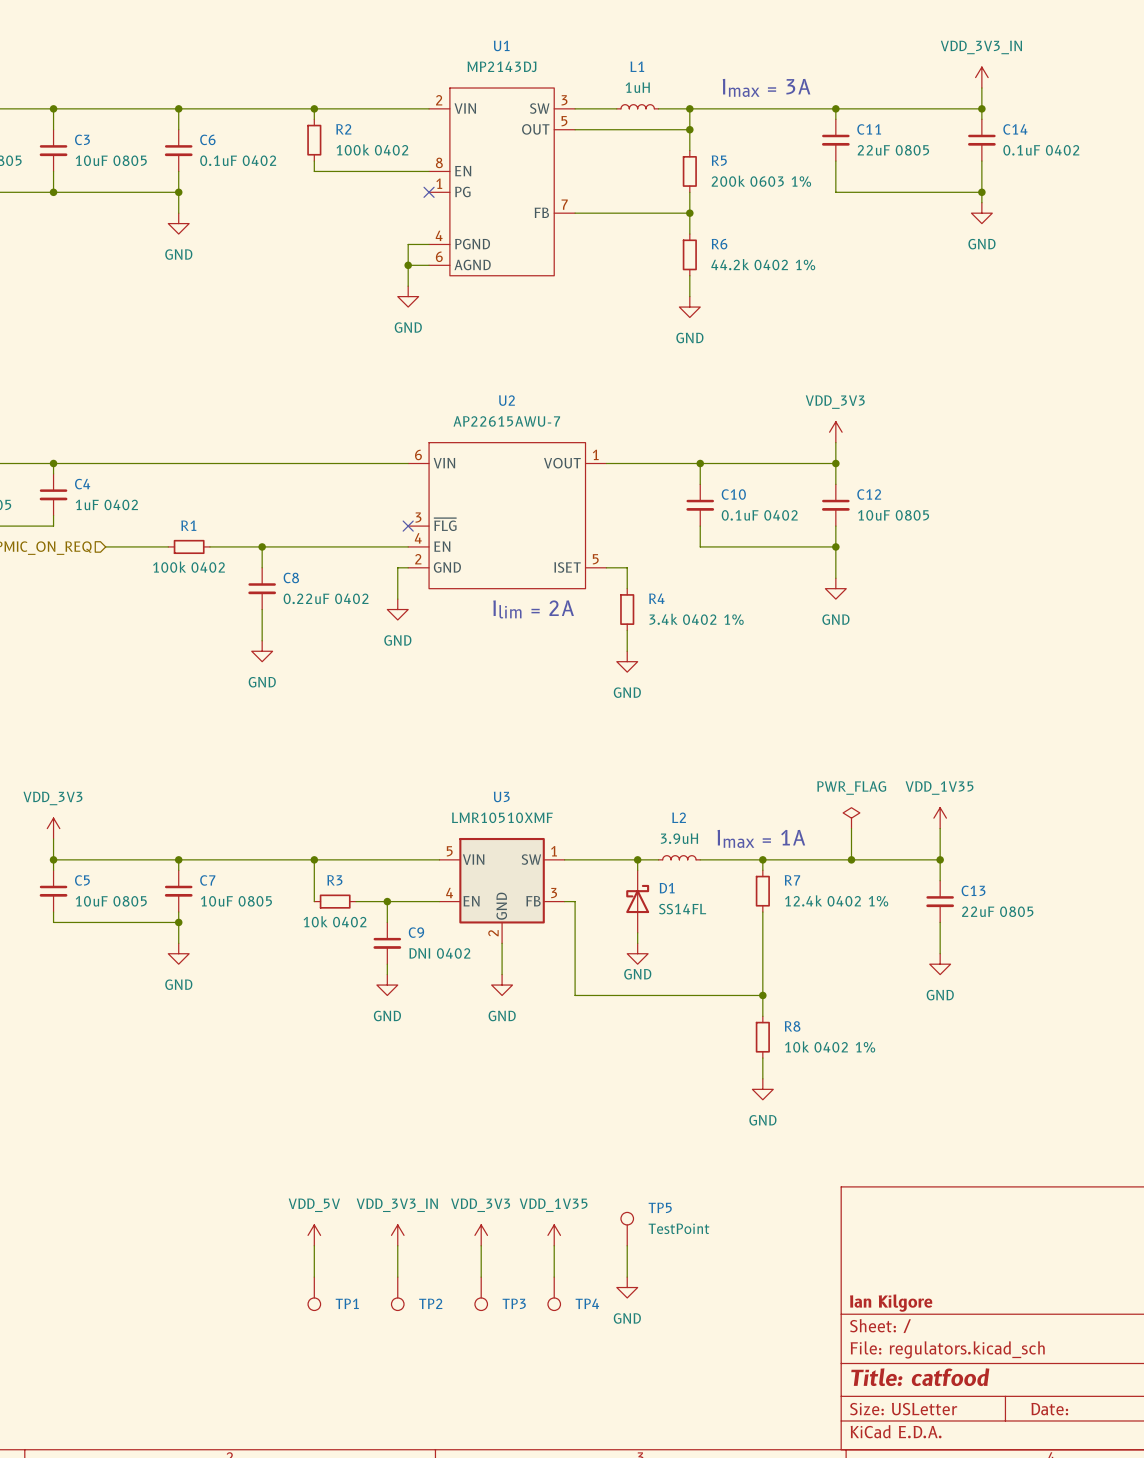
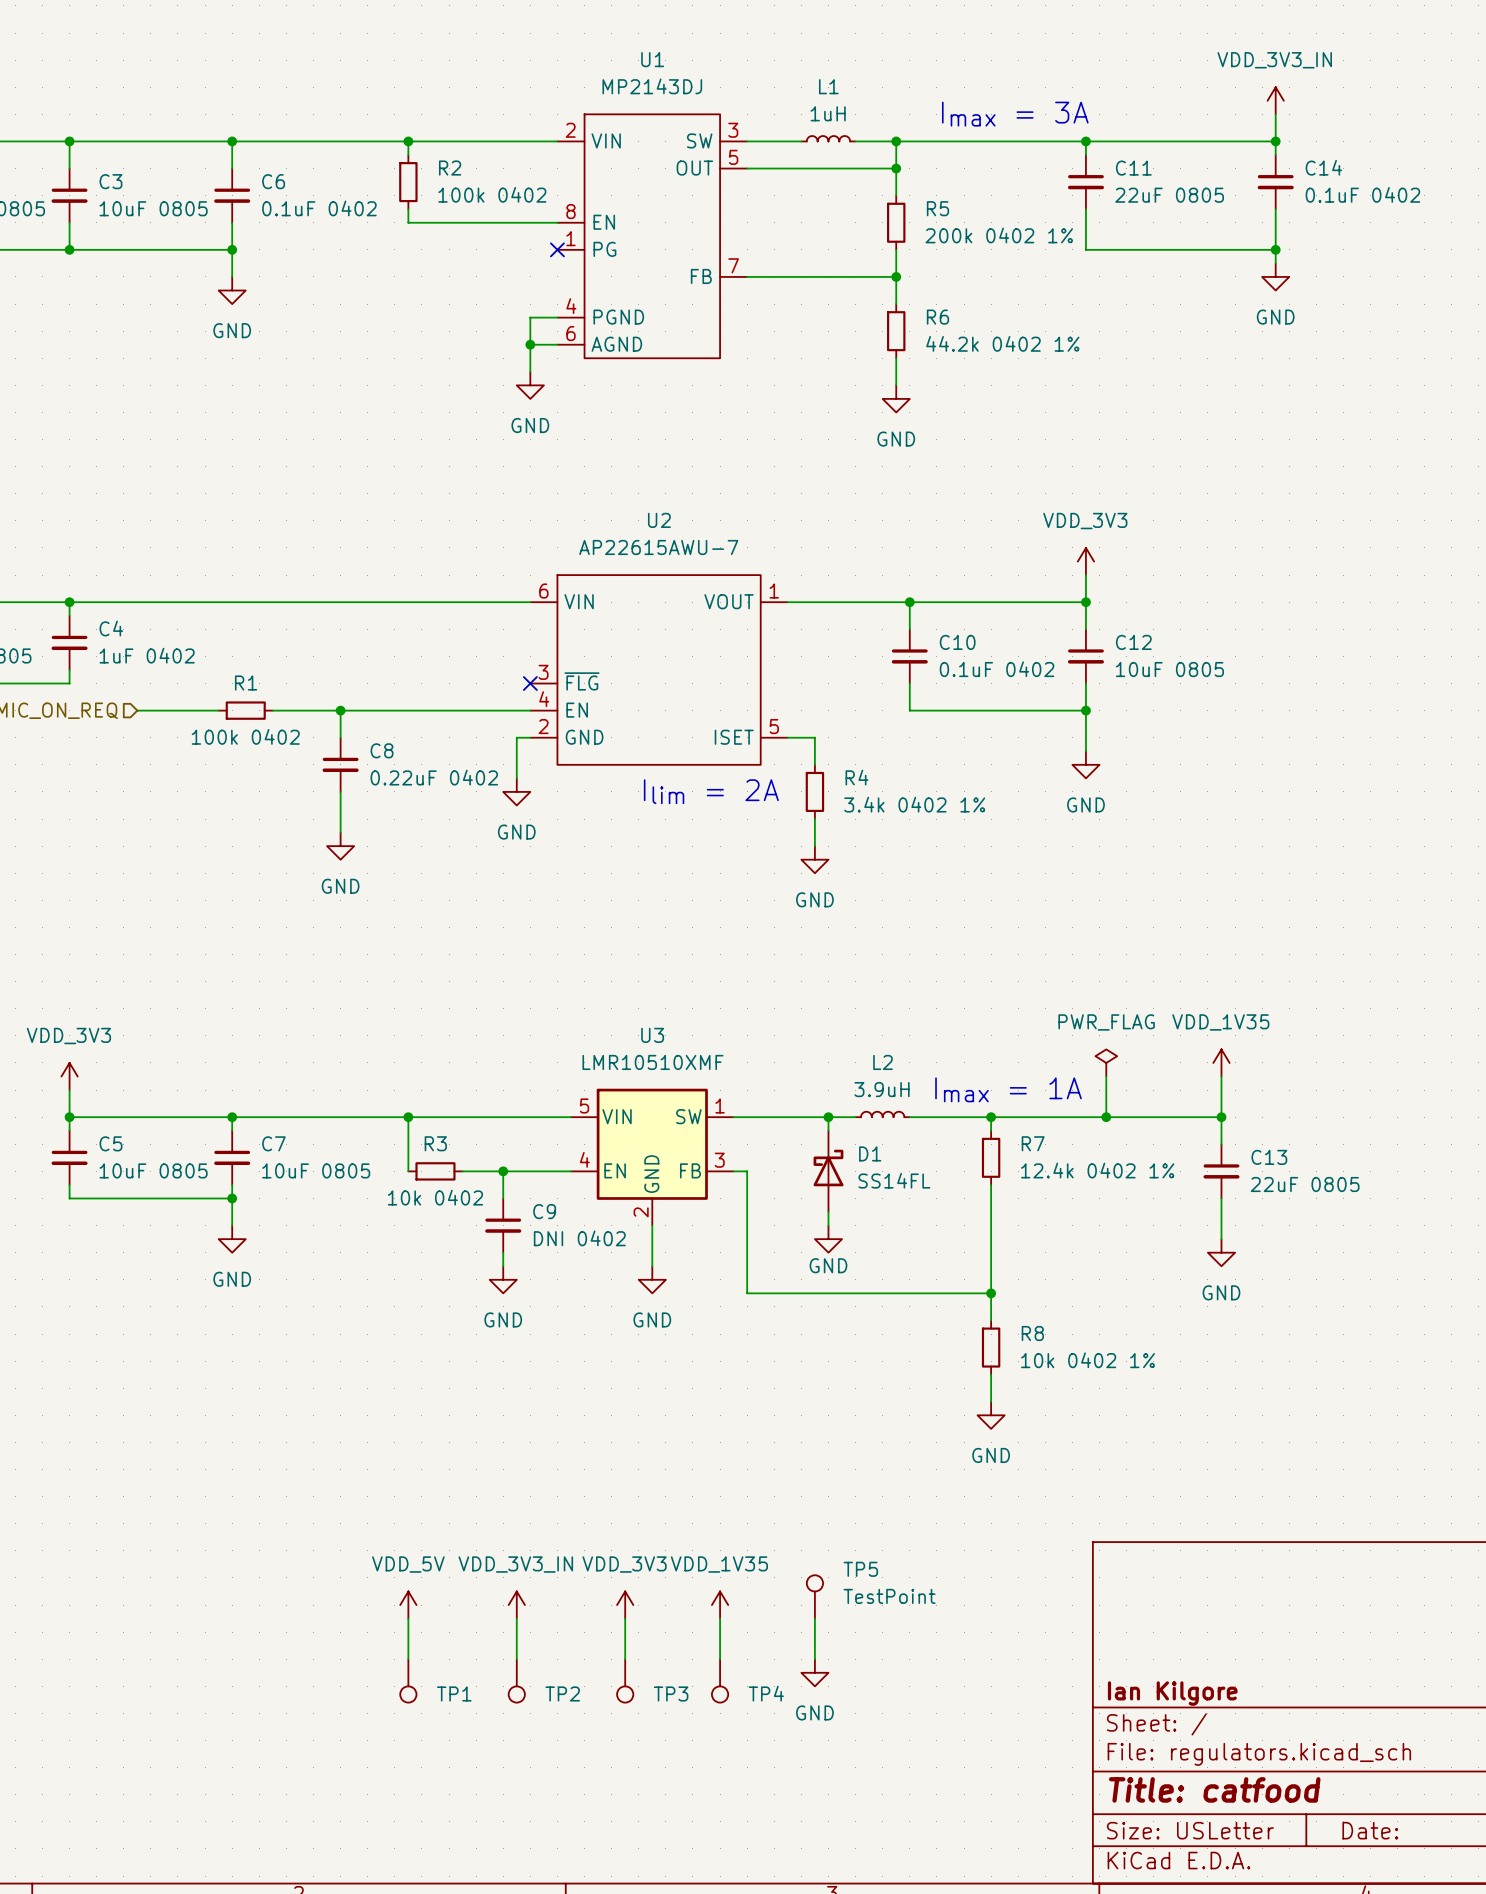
R5 value: 200k 0603 1% (761, 181) -> 200k 0402 1% (999, 235)

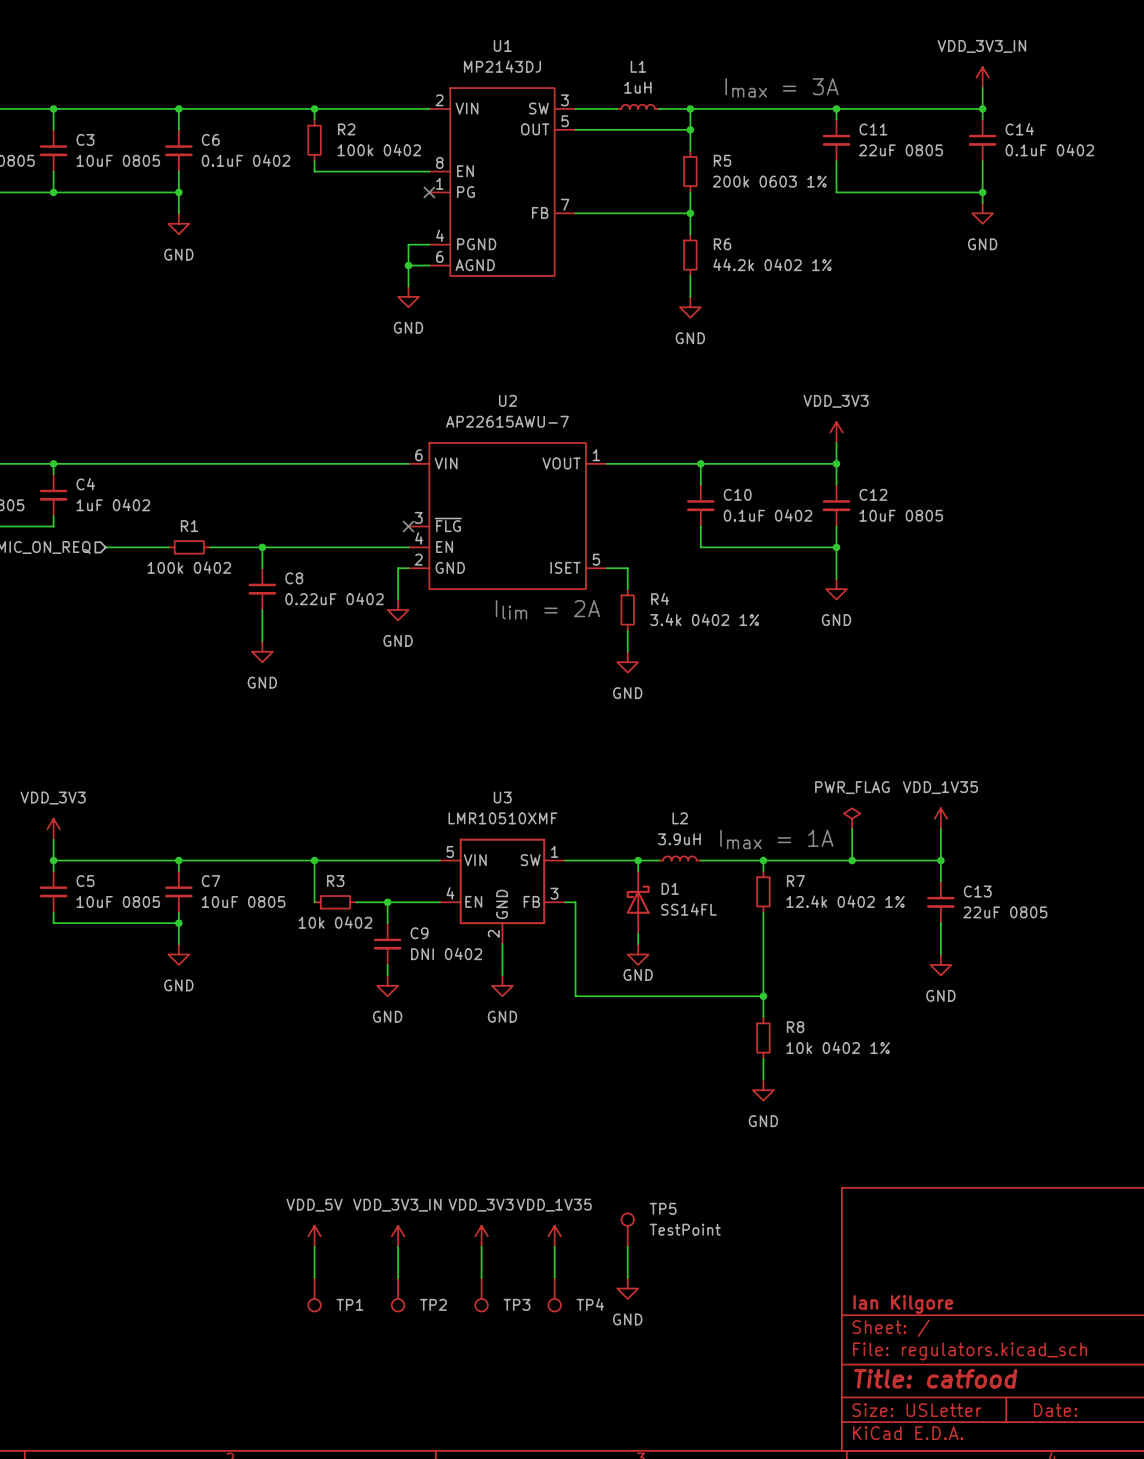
R5 value: 200k 0402 1% (999, 235) -> 200k 0603 1% (769, 181)

